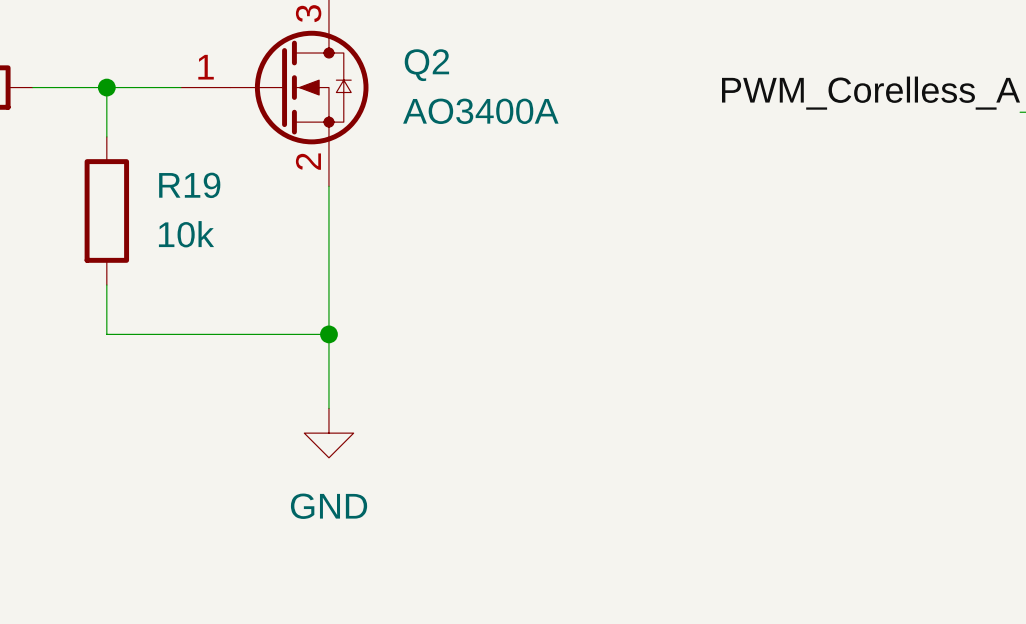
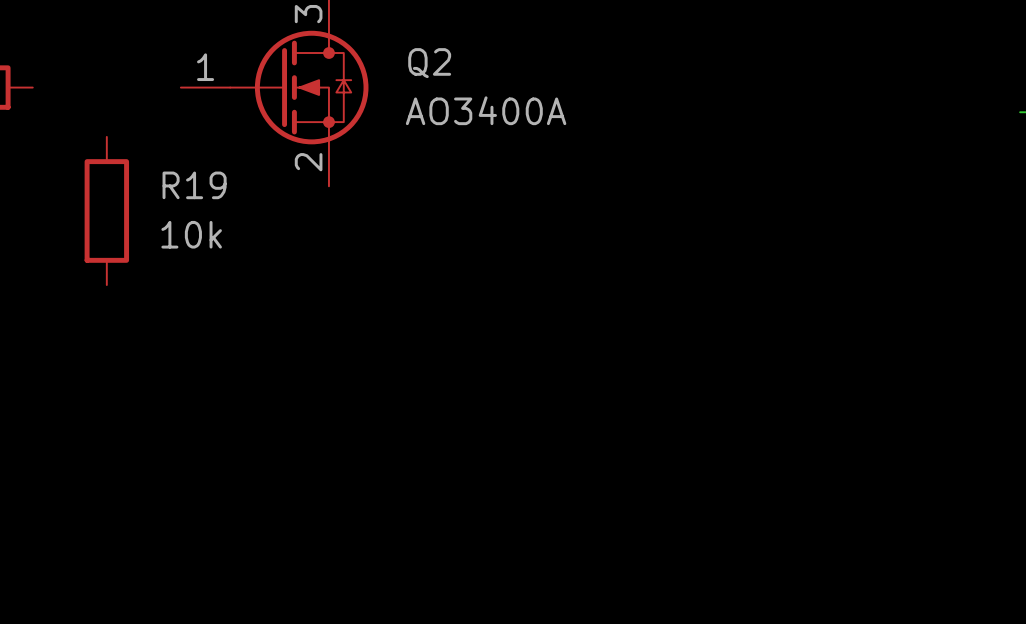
wire: (32, 87) (180, 87) -> none
wire: (106, 87) (106, 136) -> none
junction: (106, 87) -> none
label: PWM_Corelless_A (871, 93) -> none
wire: (328, 186) (328, 408) -> none
wire: (106, 285) (106, 334) (328, 334) -> none
junction: (328, 334) -> none
power symbol: GND (328, 433) -> none

